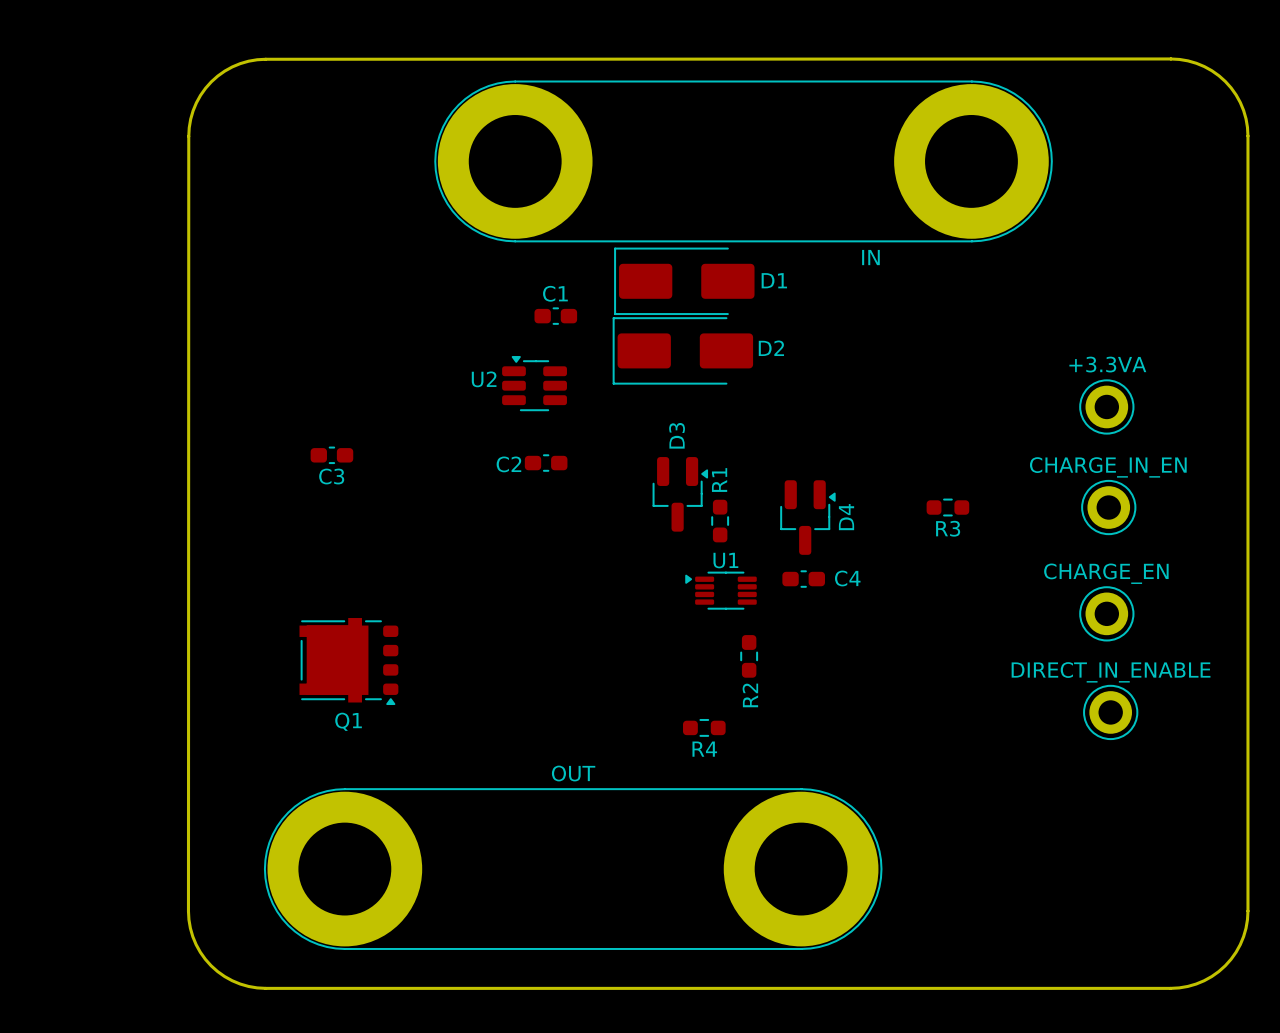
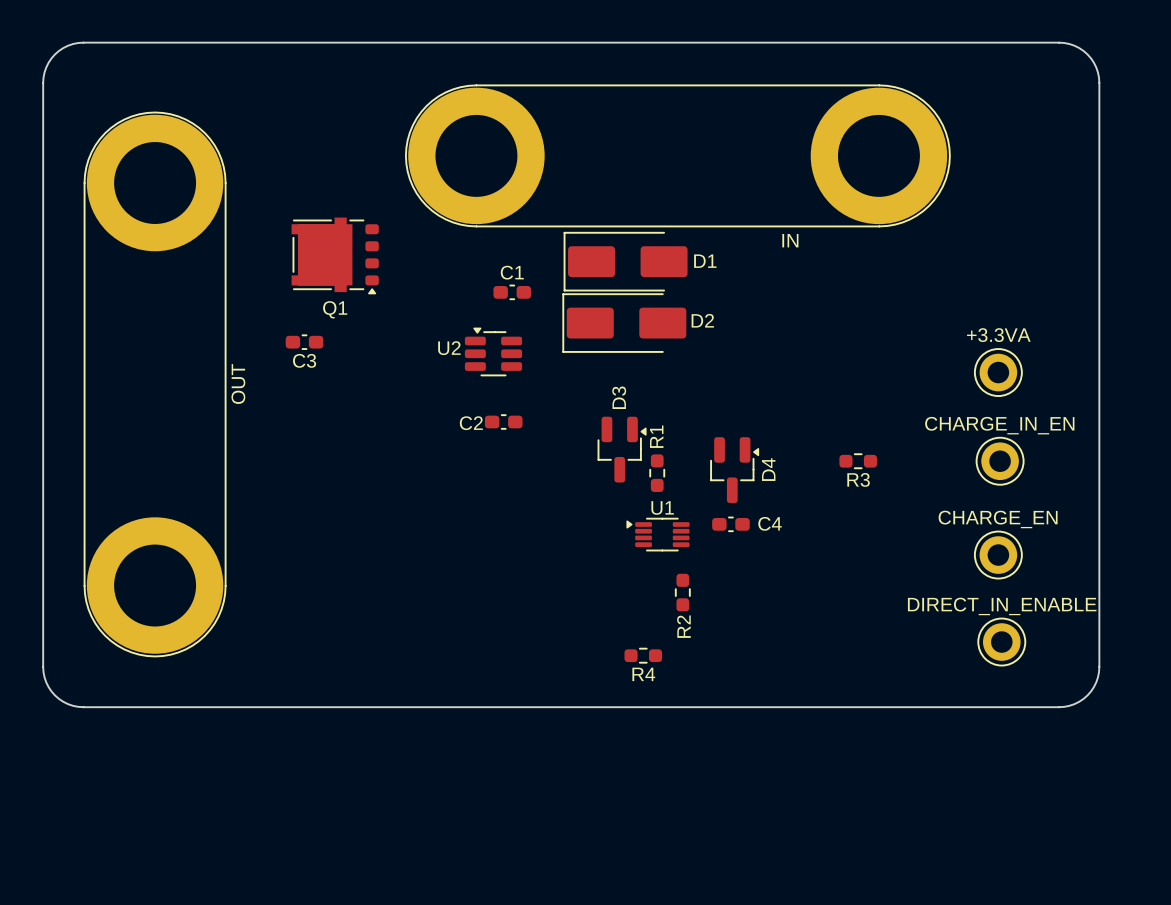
board edge: (1170, 58) (1196, 63) (1218, 75) (1236, 95) (1243, 110) (1247, 127) (1247, 911) (1246, 928) (1240, 944) (1225, 965) (1211, 976) (1196, 984) (1170, 988) (265, 988) (248, 986) (232, 980) (211, 965) (200, 952) (192, 936) (188, 911) (188, 136) (190, 119) (196, 102) (211, 81) (224, 71) (240, 63) (265, 59) (1170, 58) -> (83, 42) (68, 45) (54, 54) (46, 67) (43, 82) (43, 666) (48, 687) (63, 701) (83, 707) (1059, 707) (1079, 701) (1093, 687) (1099, 666) (1099, 82) (1093, 62) (1079, 48) (1059, 42) (83, 42)
OUT: none -> (155, 384)
C3 position: (331, 455) -> (304, 342)
Q1 position: (348, 661) -> (335, 255)
OUT: (573, 869) -> none

